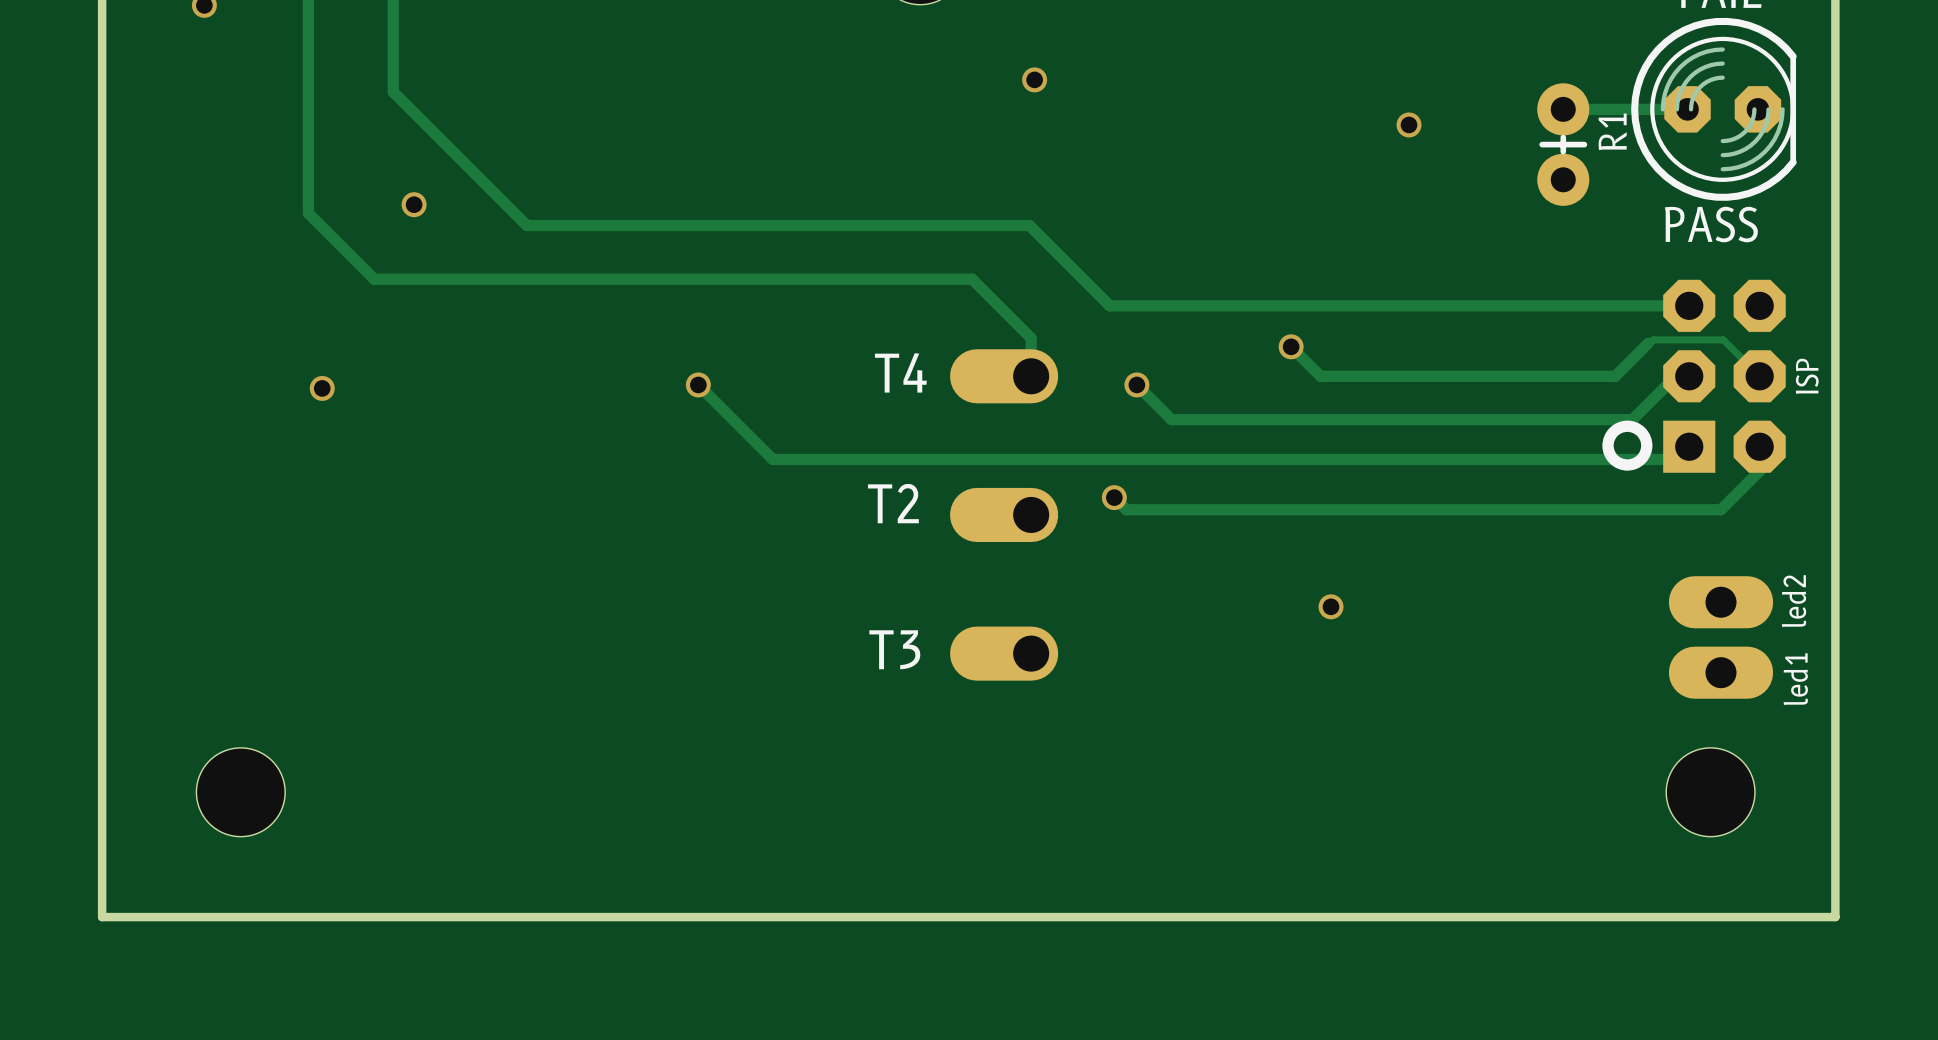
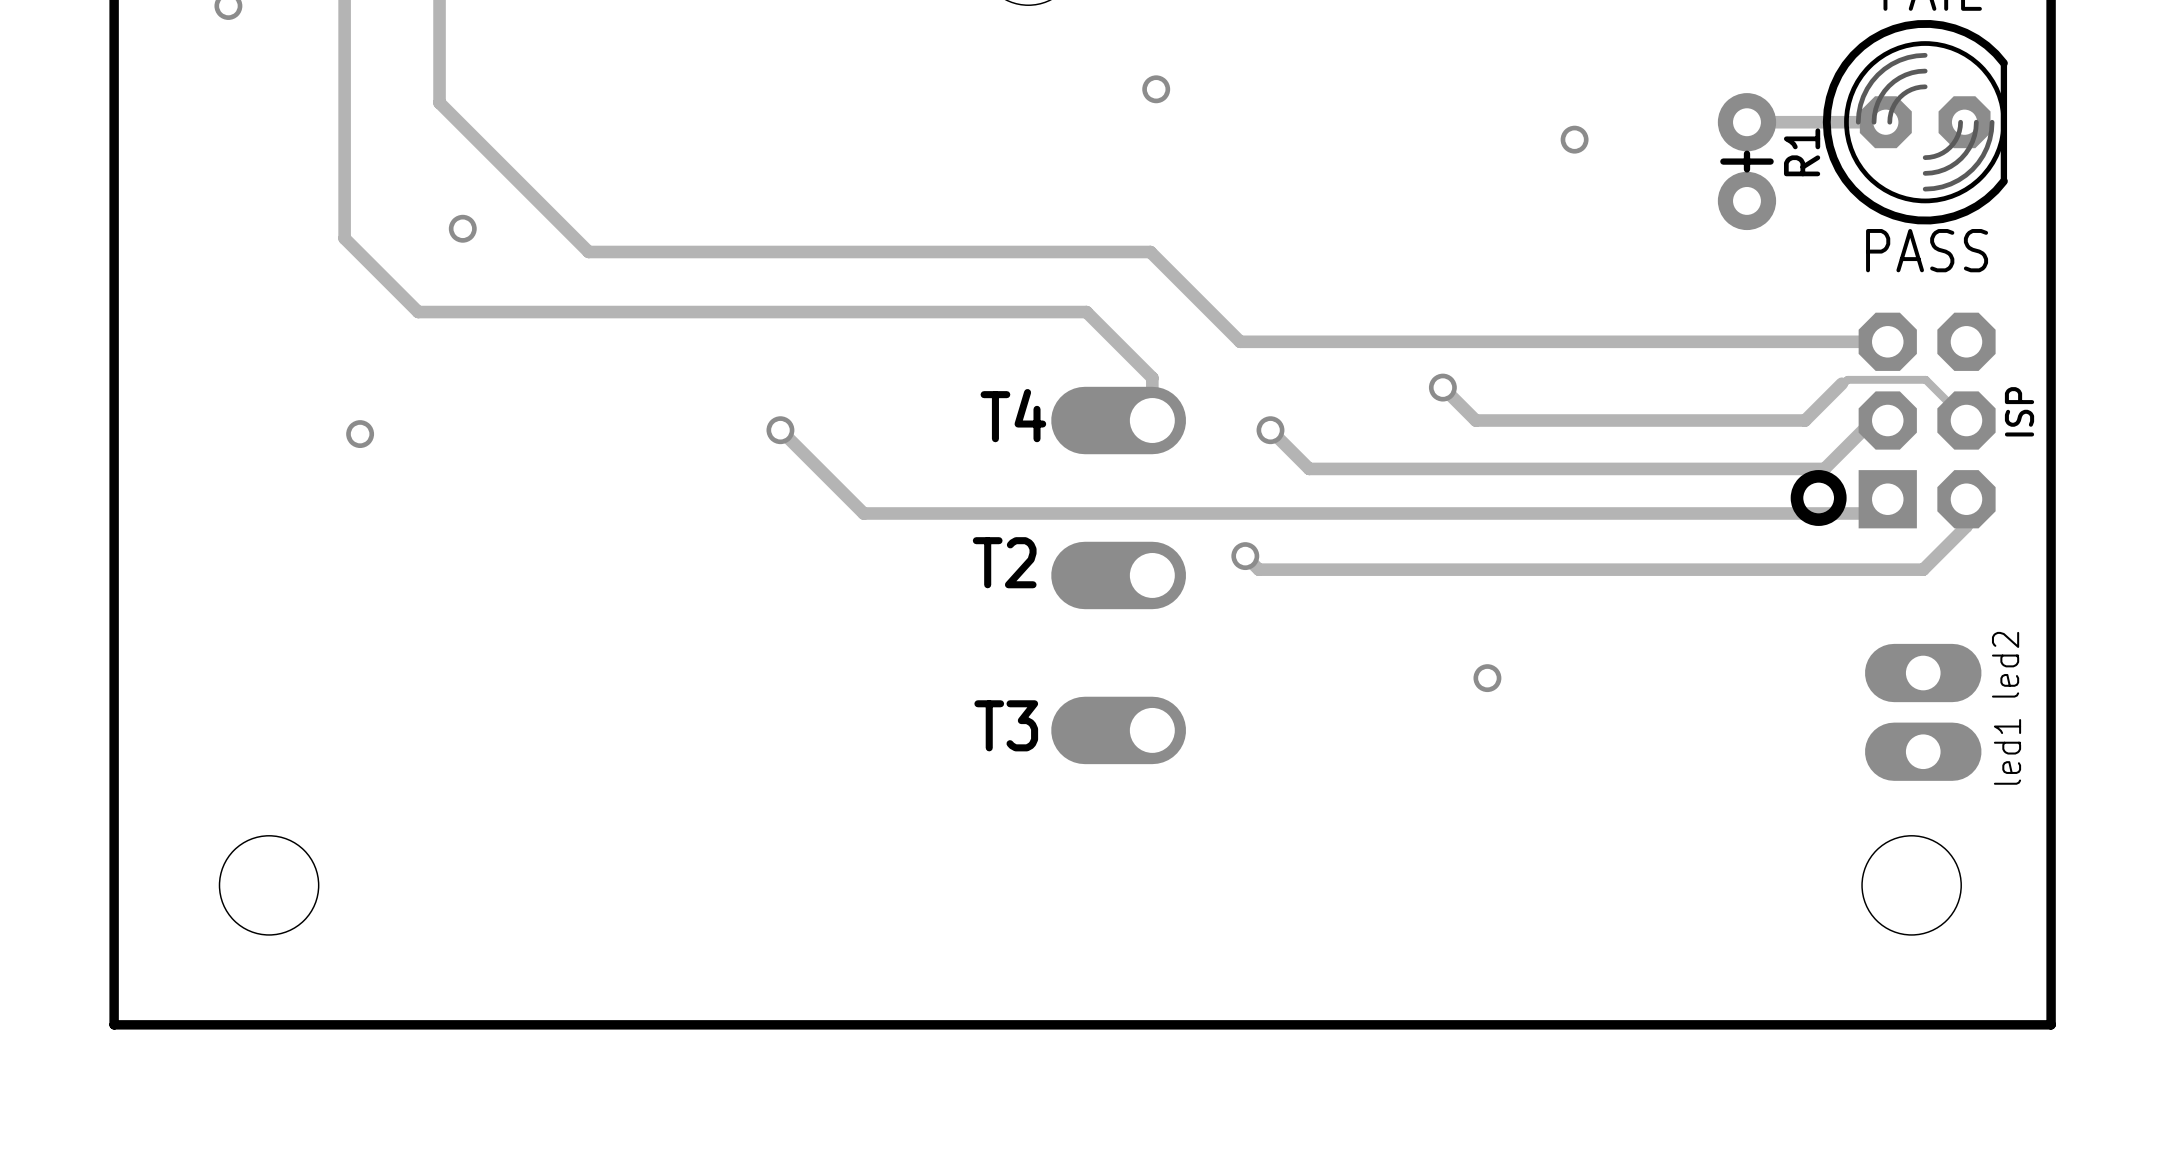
T4 footprint: [950, 349, 1059, 404] -> [1051, 386, 1187, 455]
T2 footprint: [950, 487, 1059, 542] -> [1051, 541, 1187, 610]
T3 footprint: [950, 626, 1059, 681] -> [1051, 696, 1187, 765]

